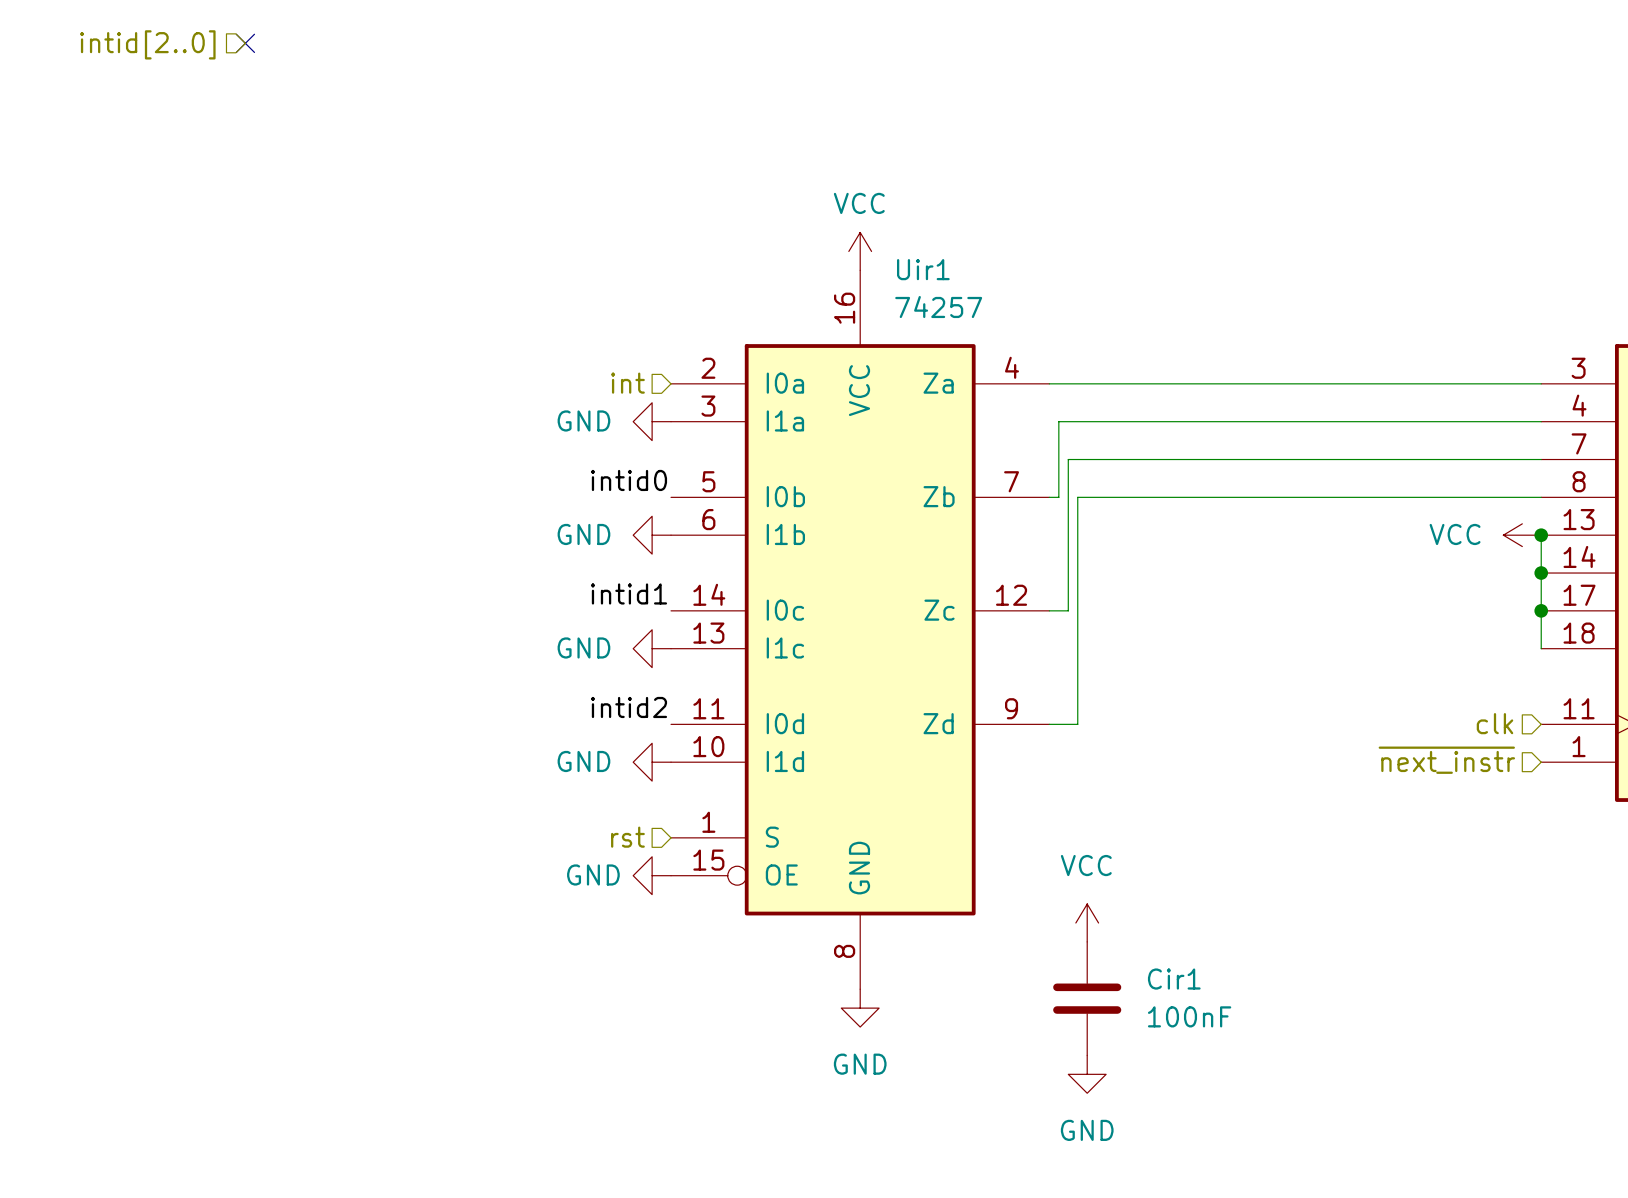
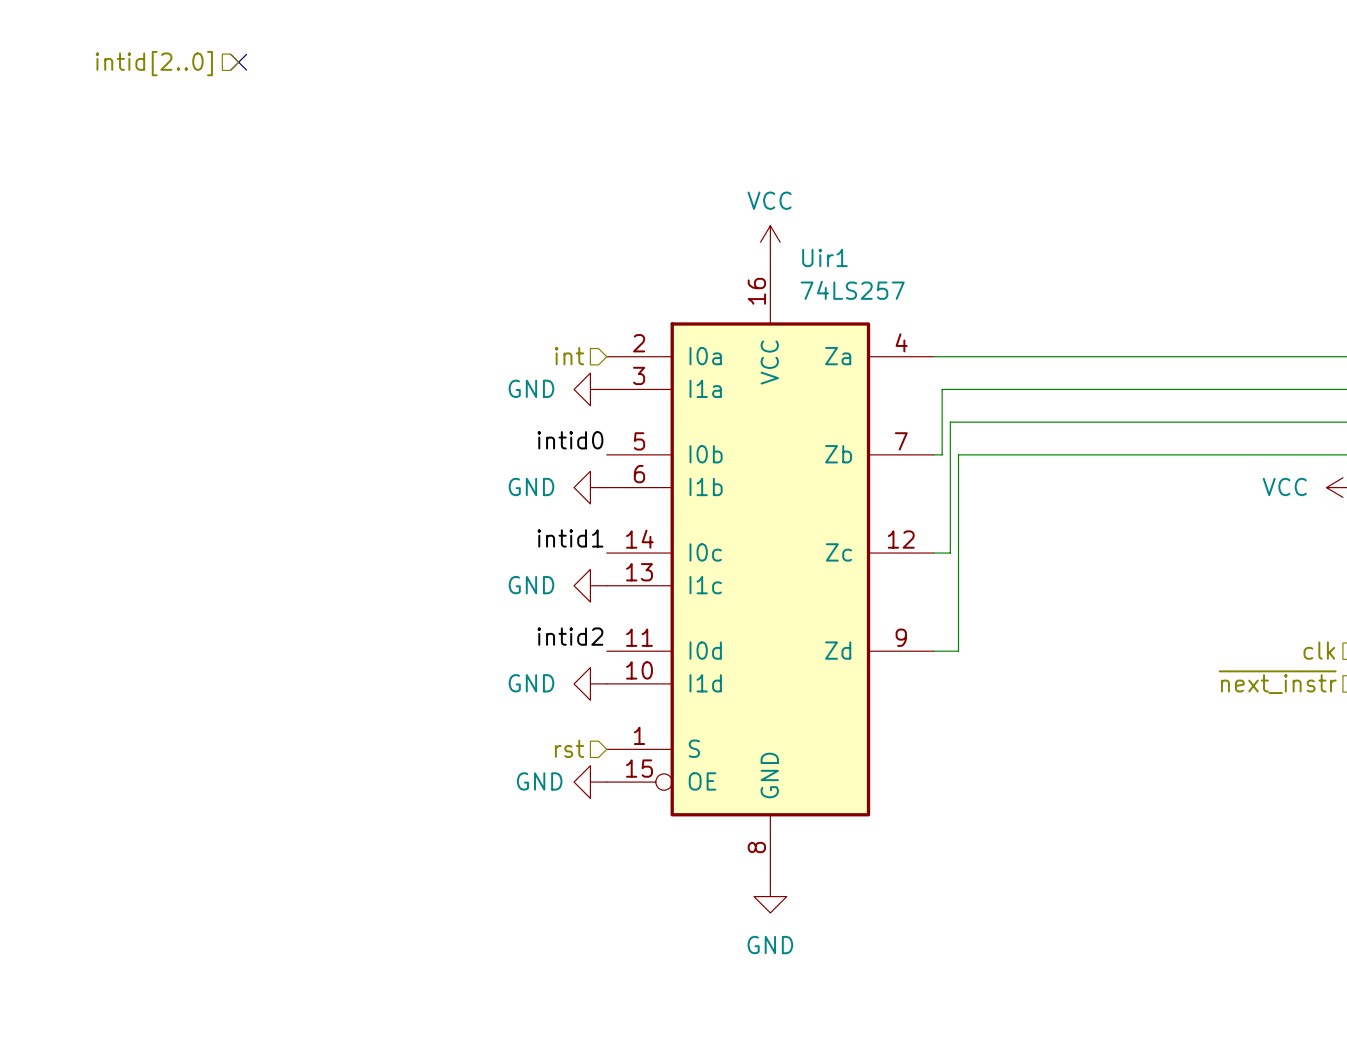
Uir1 value: 74257 (938, 307) -> 74LS257 (852, 290)
power symbol: VCC (1087, 922) -> none
Cir1: 100nF (1087, 998) -> none
power symbol: GND (1087, 1074) -> none

